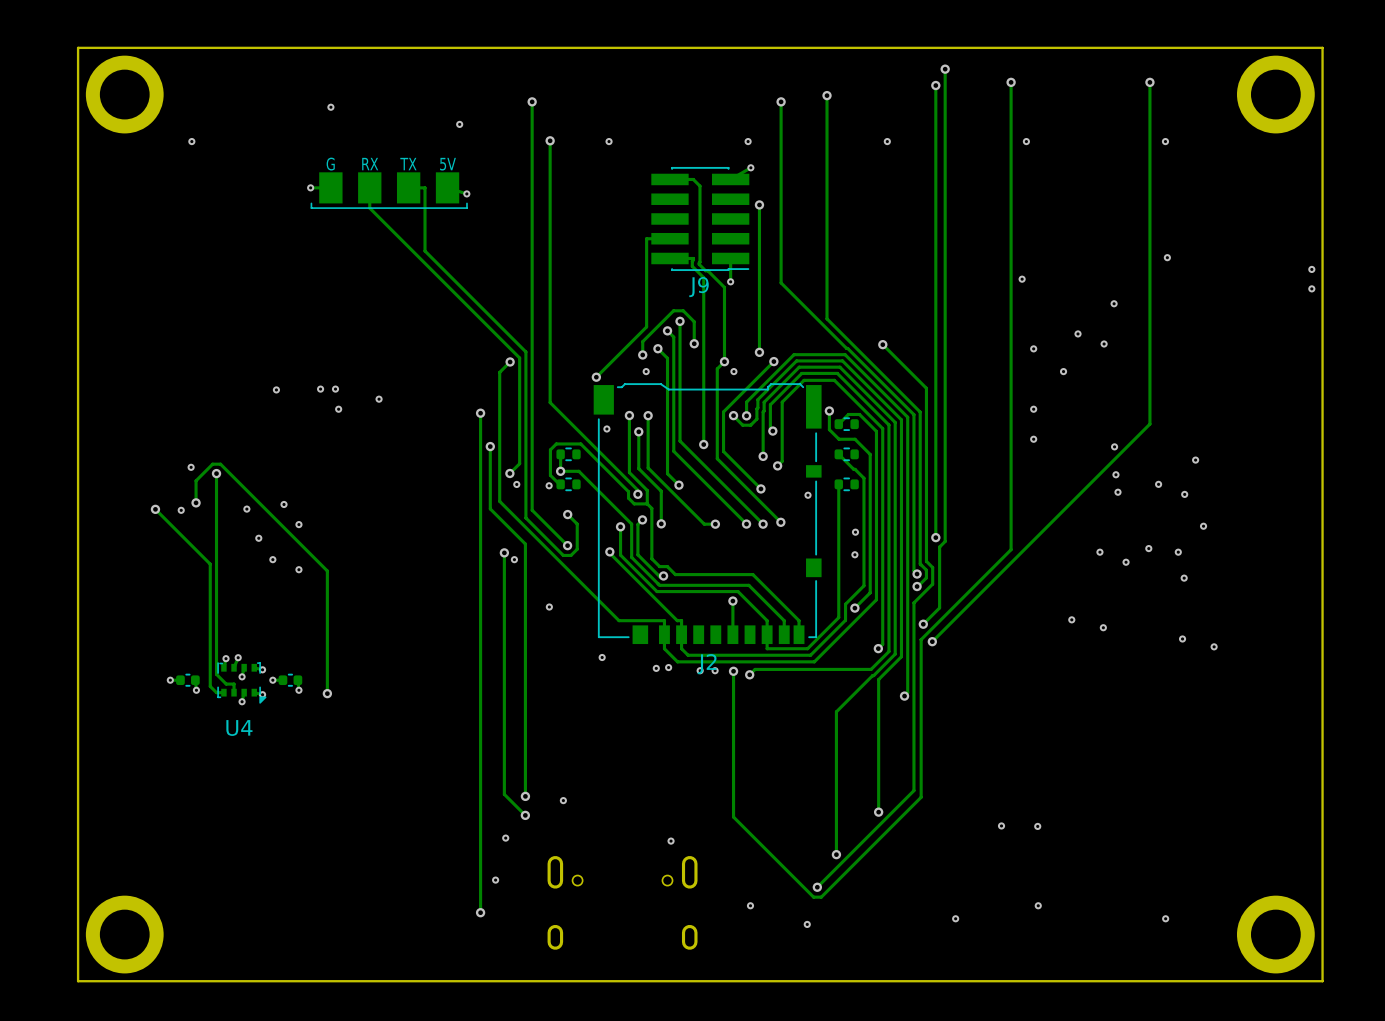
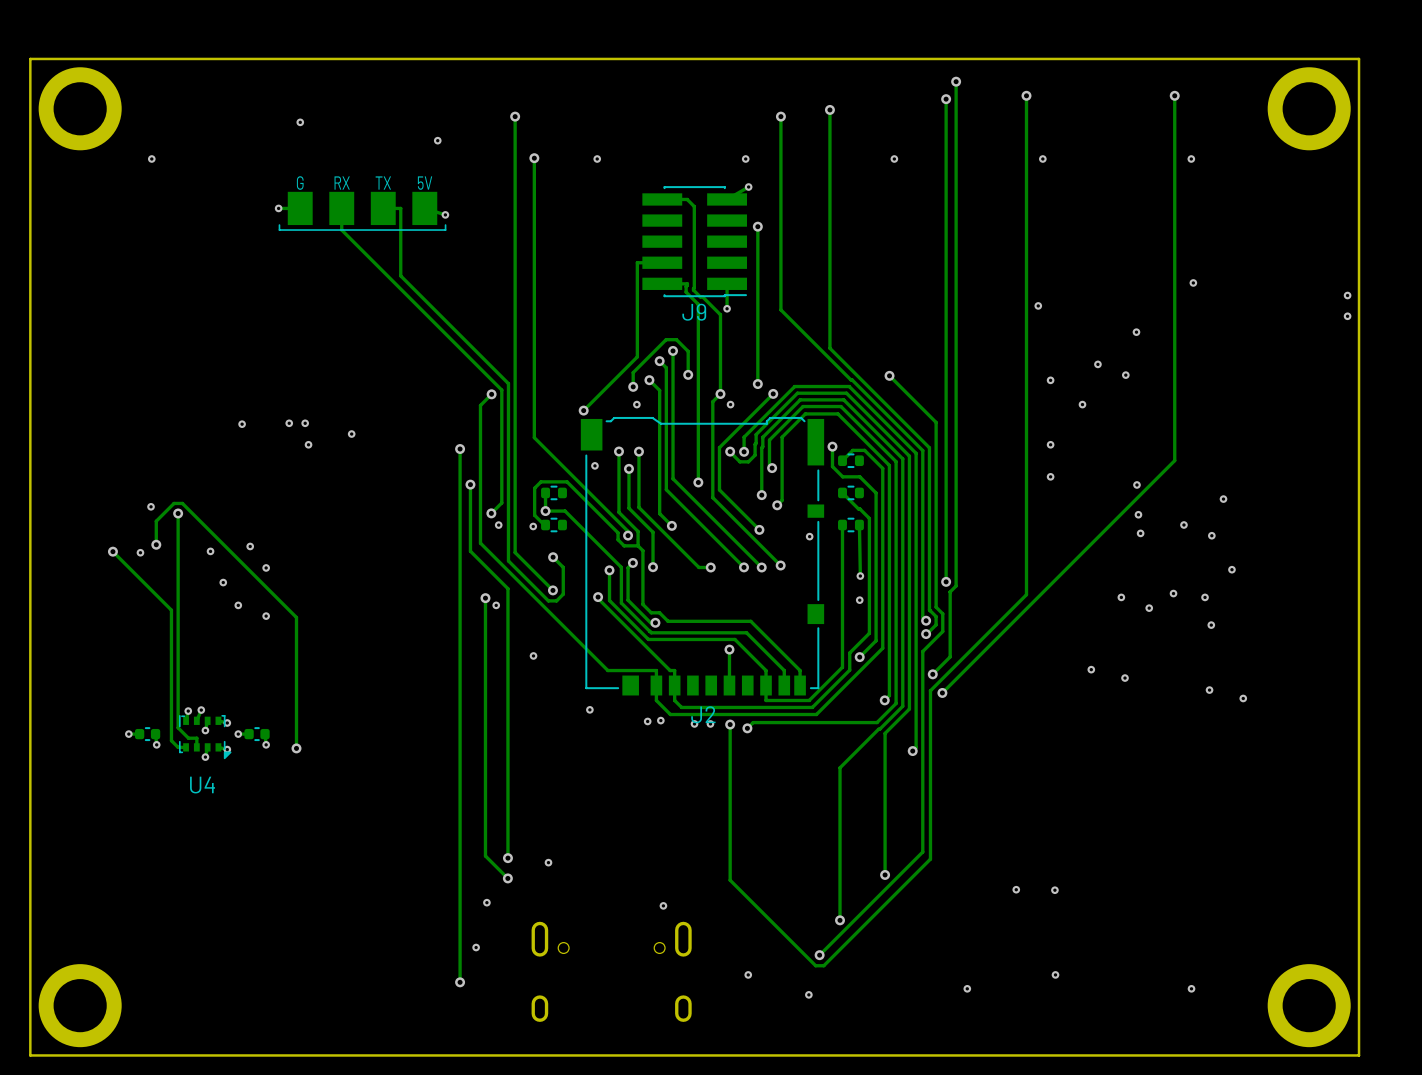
track: none -> (859, 524) (860, 576)

